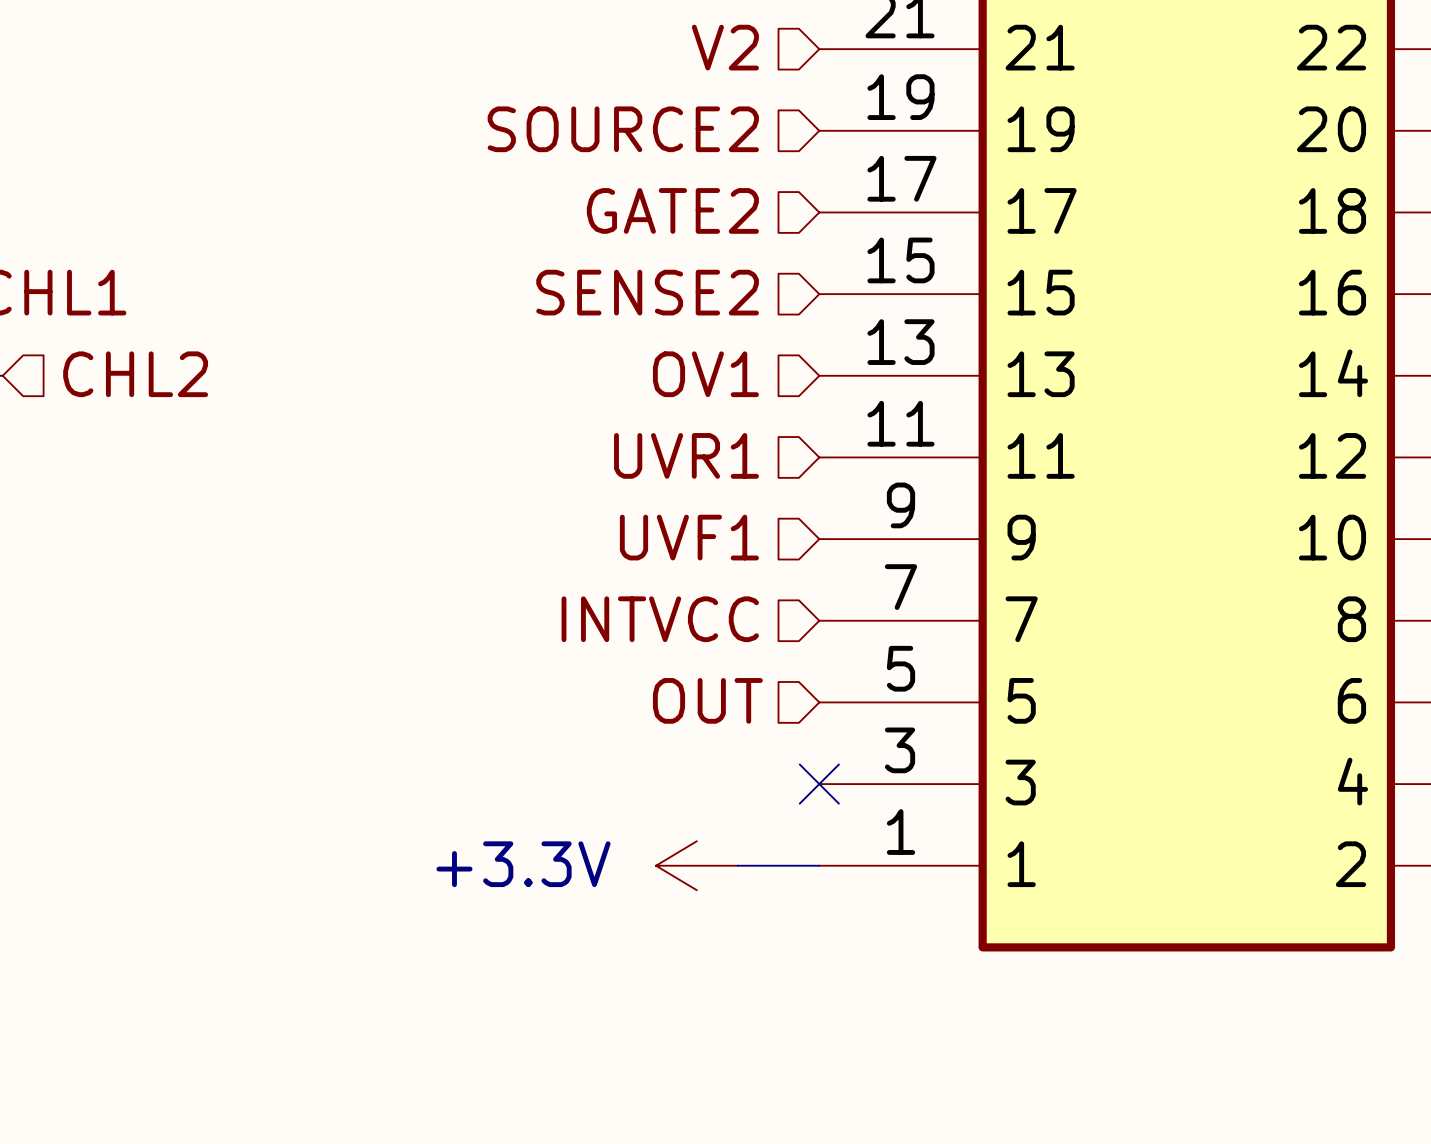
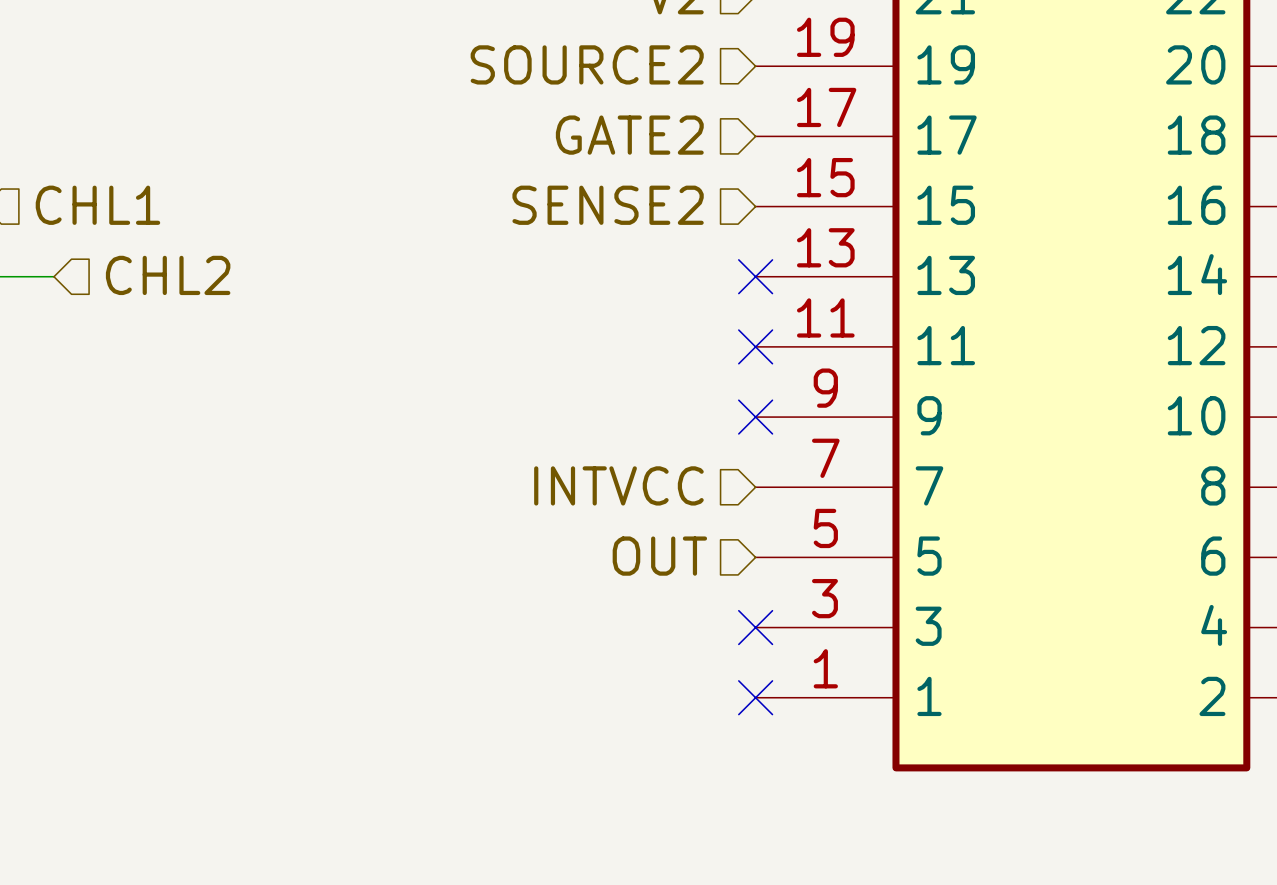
hierarchical label: OV1 (705, 374) -> none
no-connect mark: none -> (755, 276)
hierarchical label: UVR1 (686, 455) -> none
no-connect mark: none -> (755, 346)
hierarchical label: UVF1 (689, 537) -> none
no-connect mark: none -> (755, 417)
power symbol: +3.3V (696, 865) -> none
wire: (737, 865) (819, 865) -> none
no-connect mark: none -> (755, 697)

